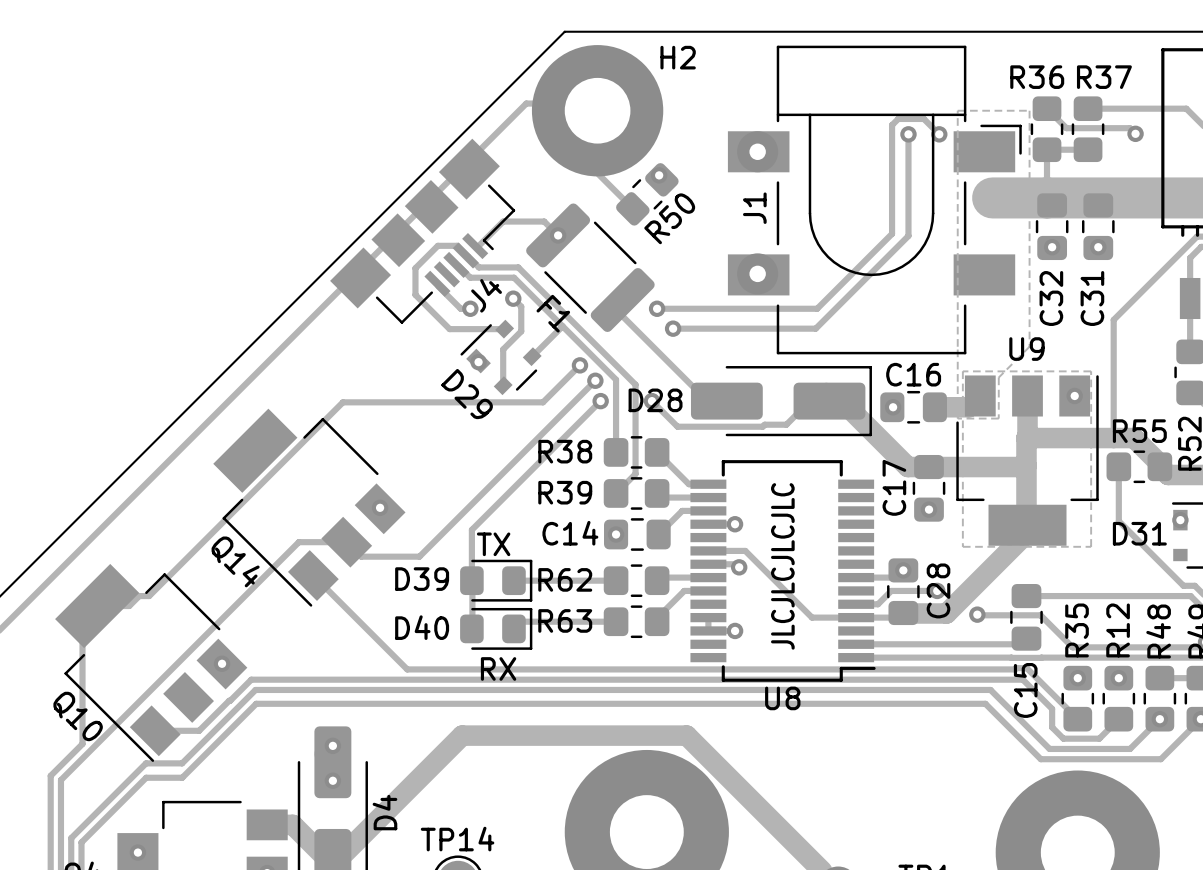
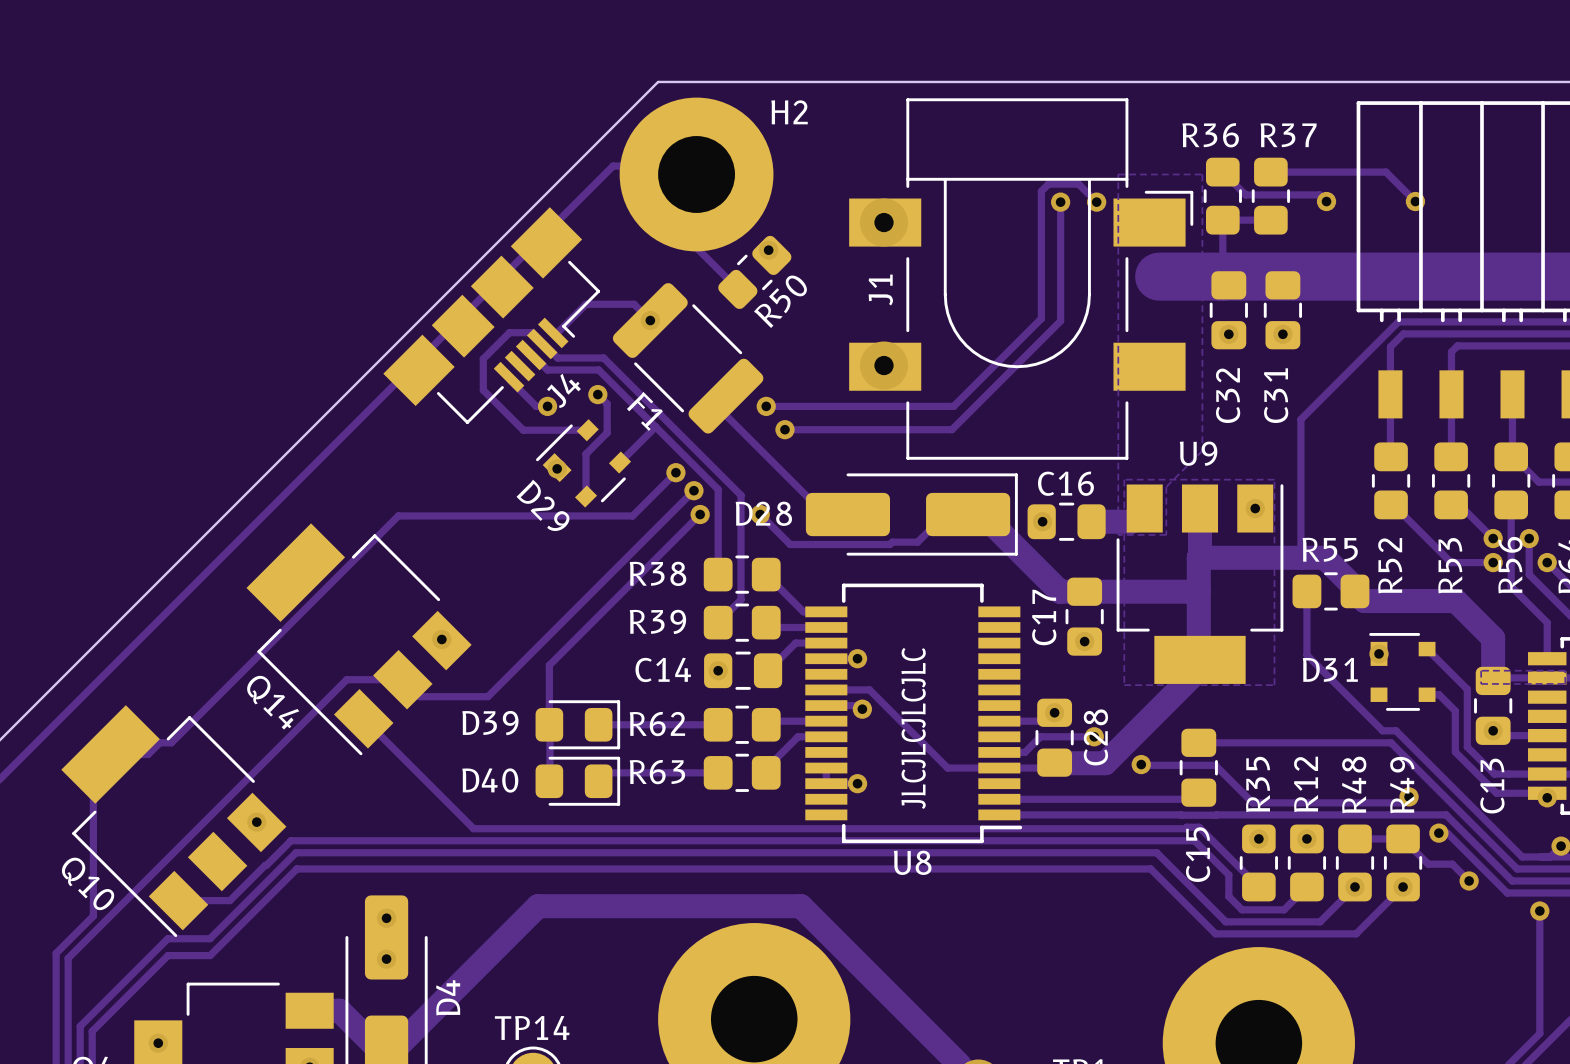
text: TX (493, 544) -> none
text: RX (498, 668) -> none

